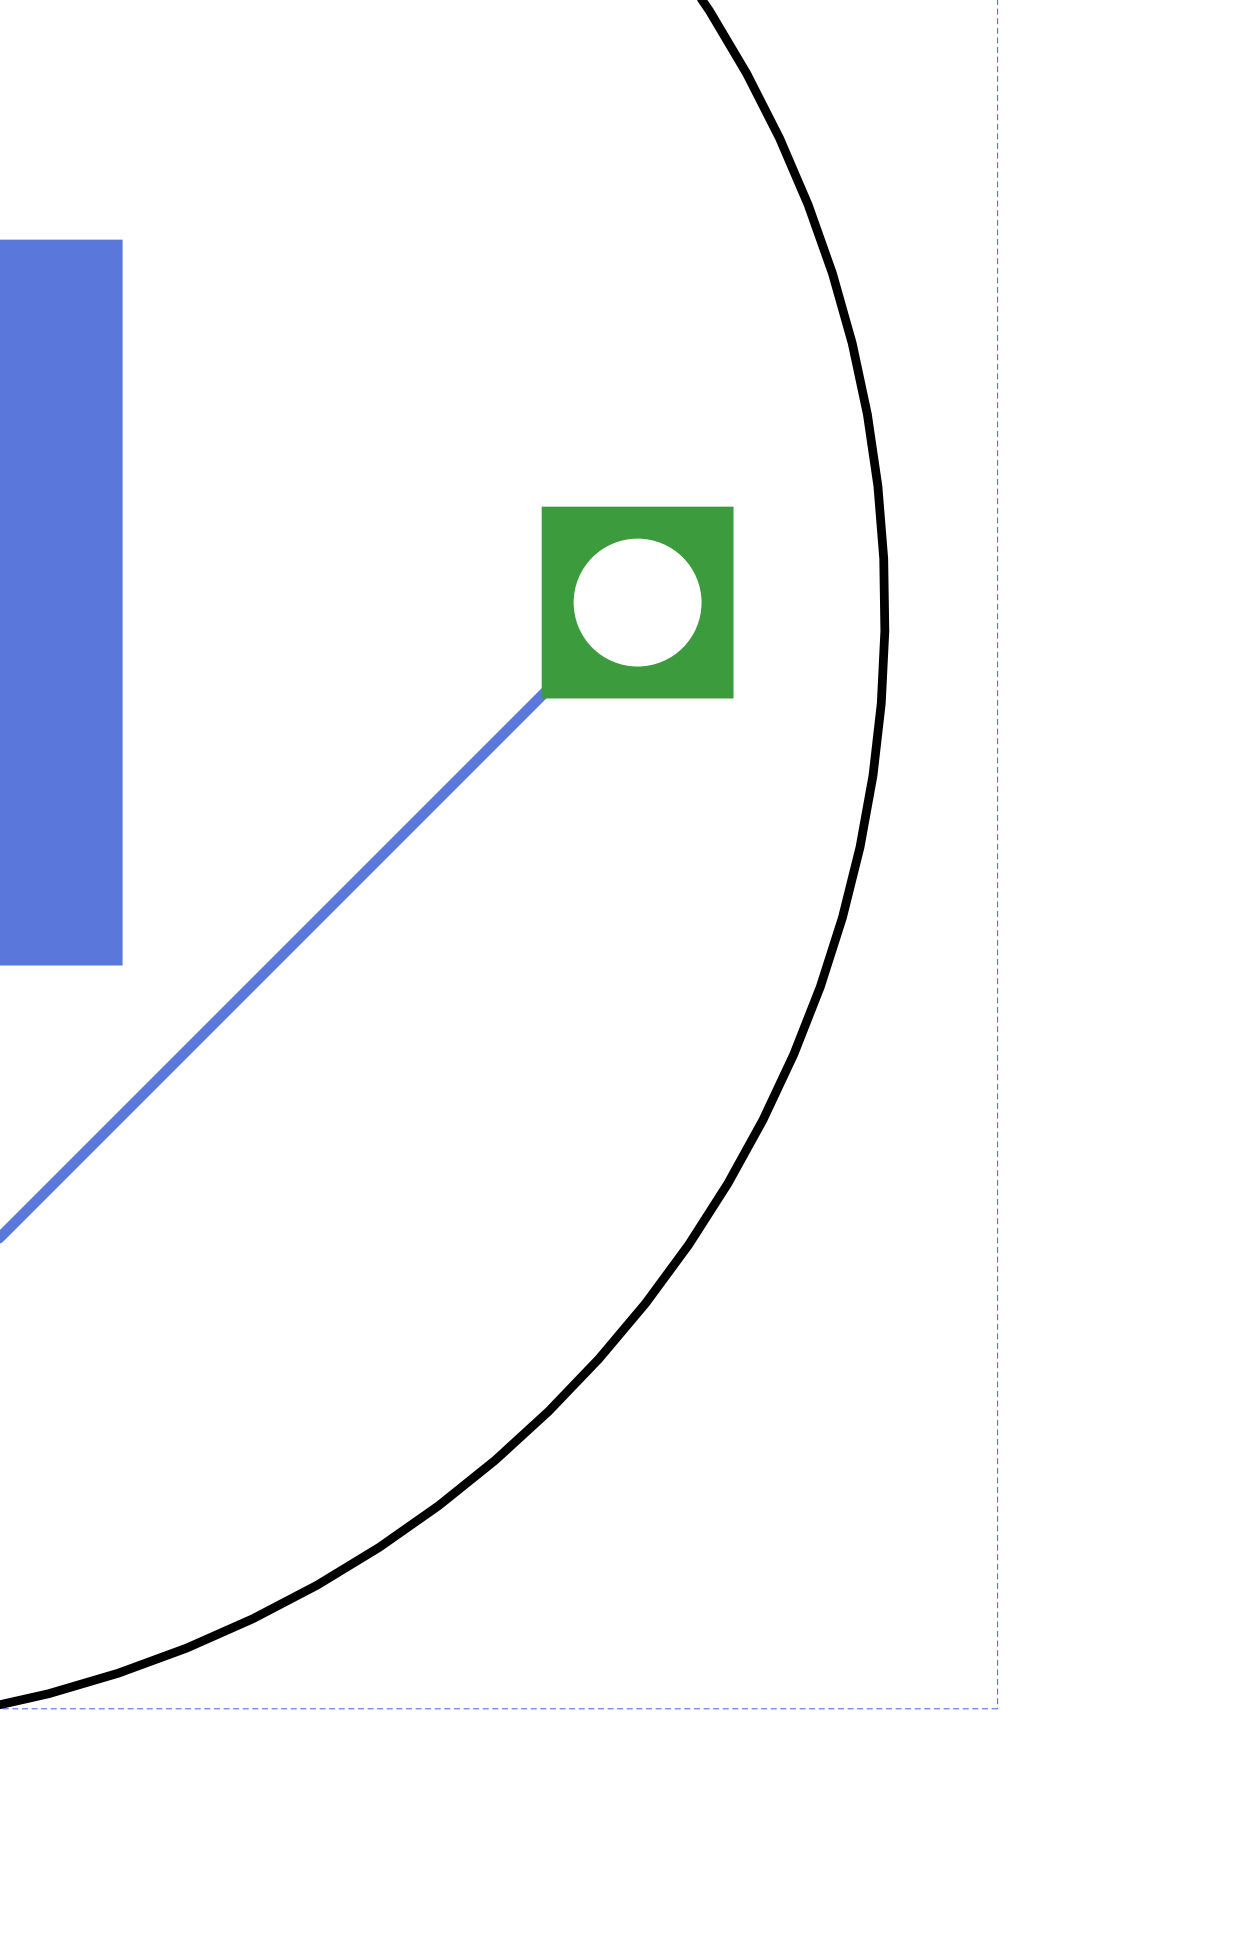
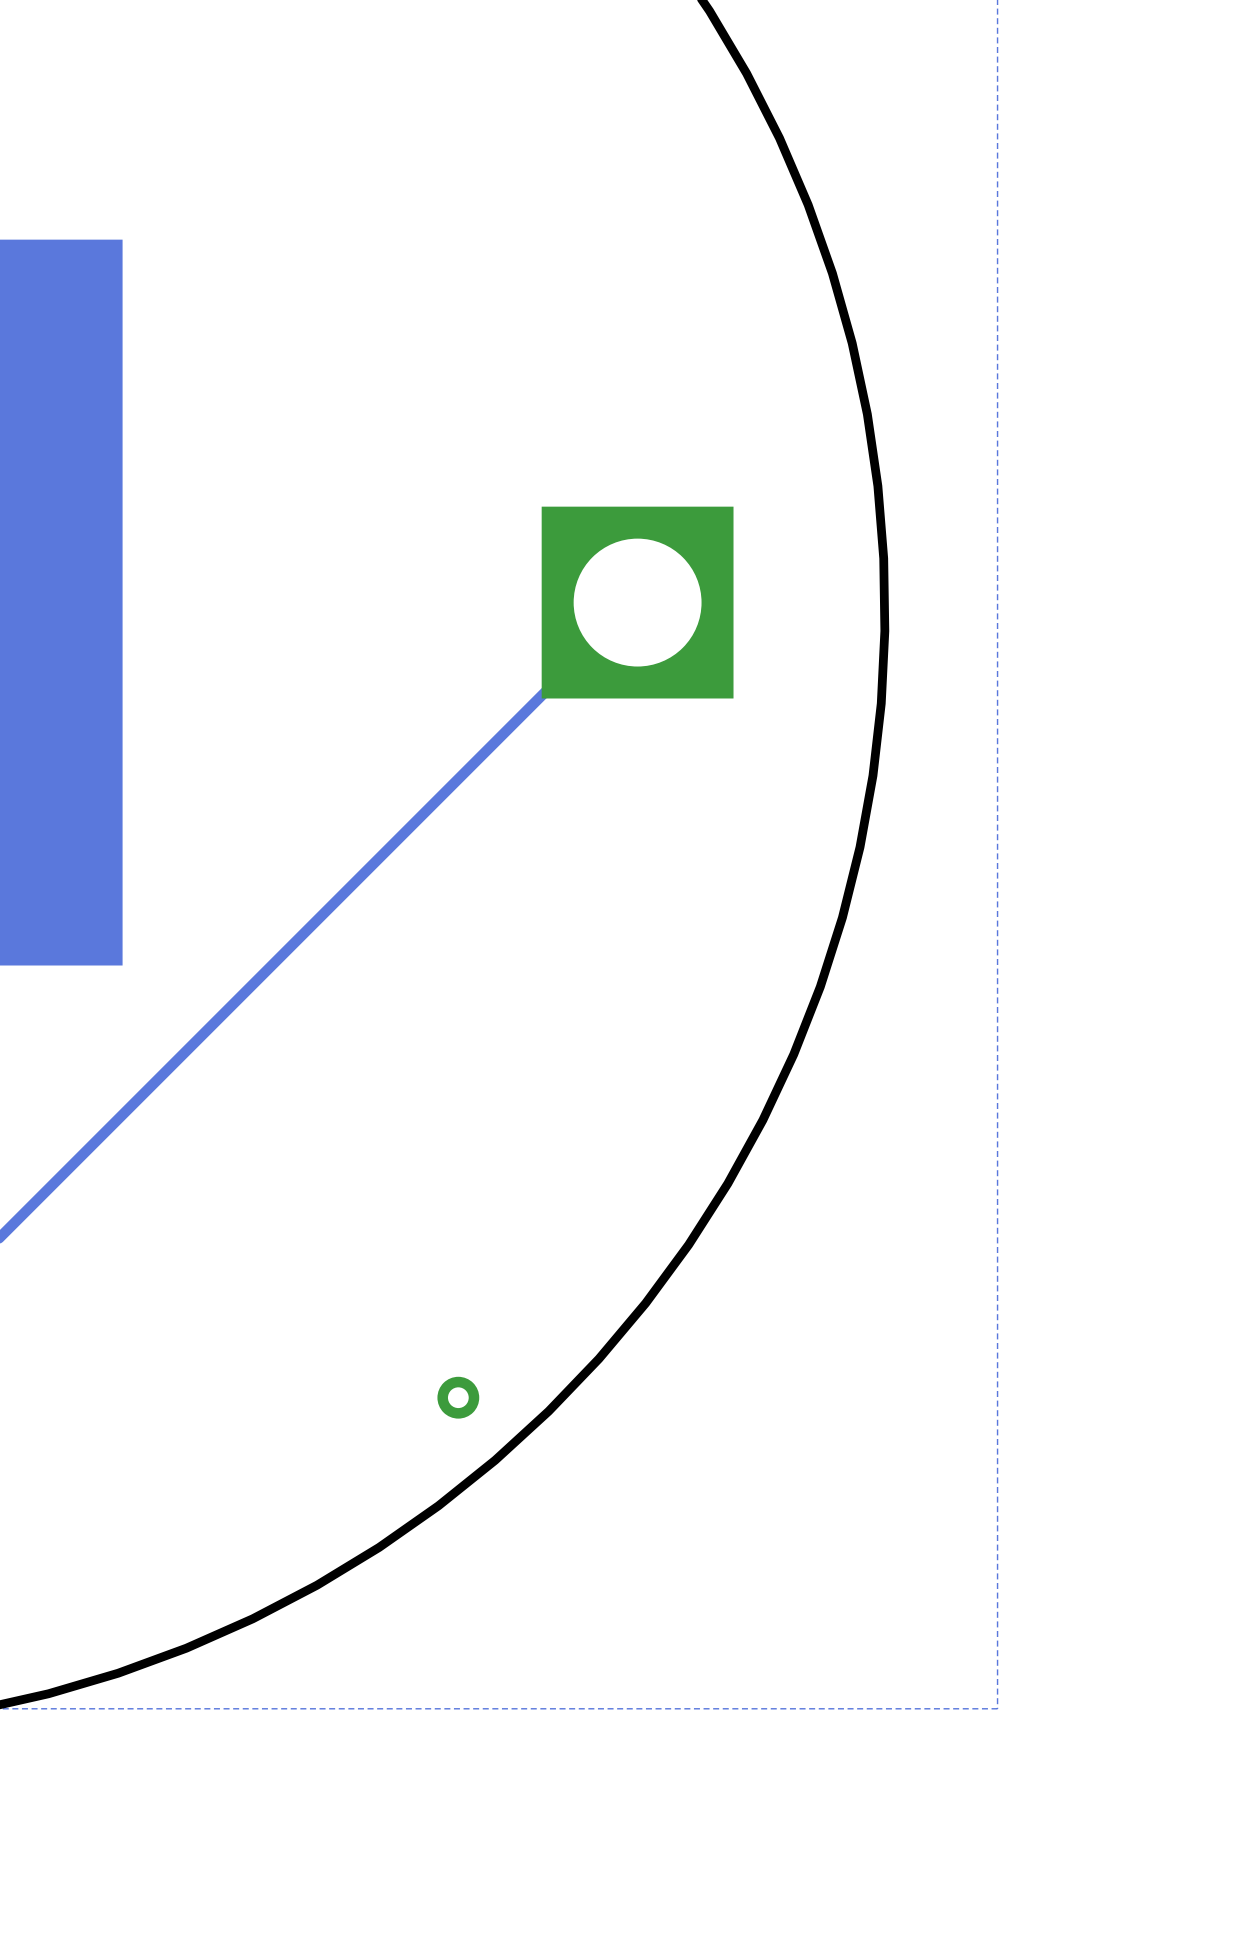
via: none -> (458, 1397)

